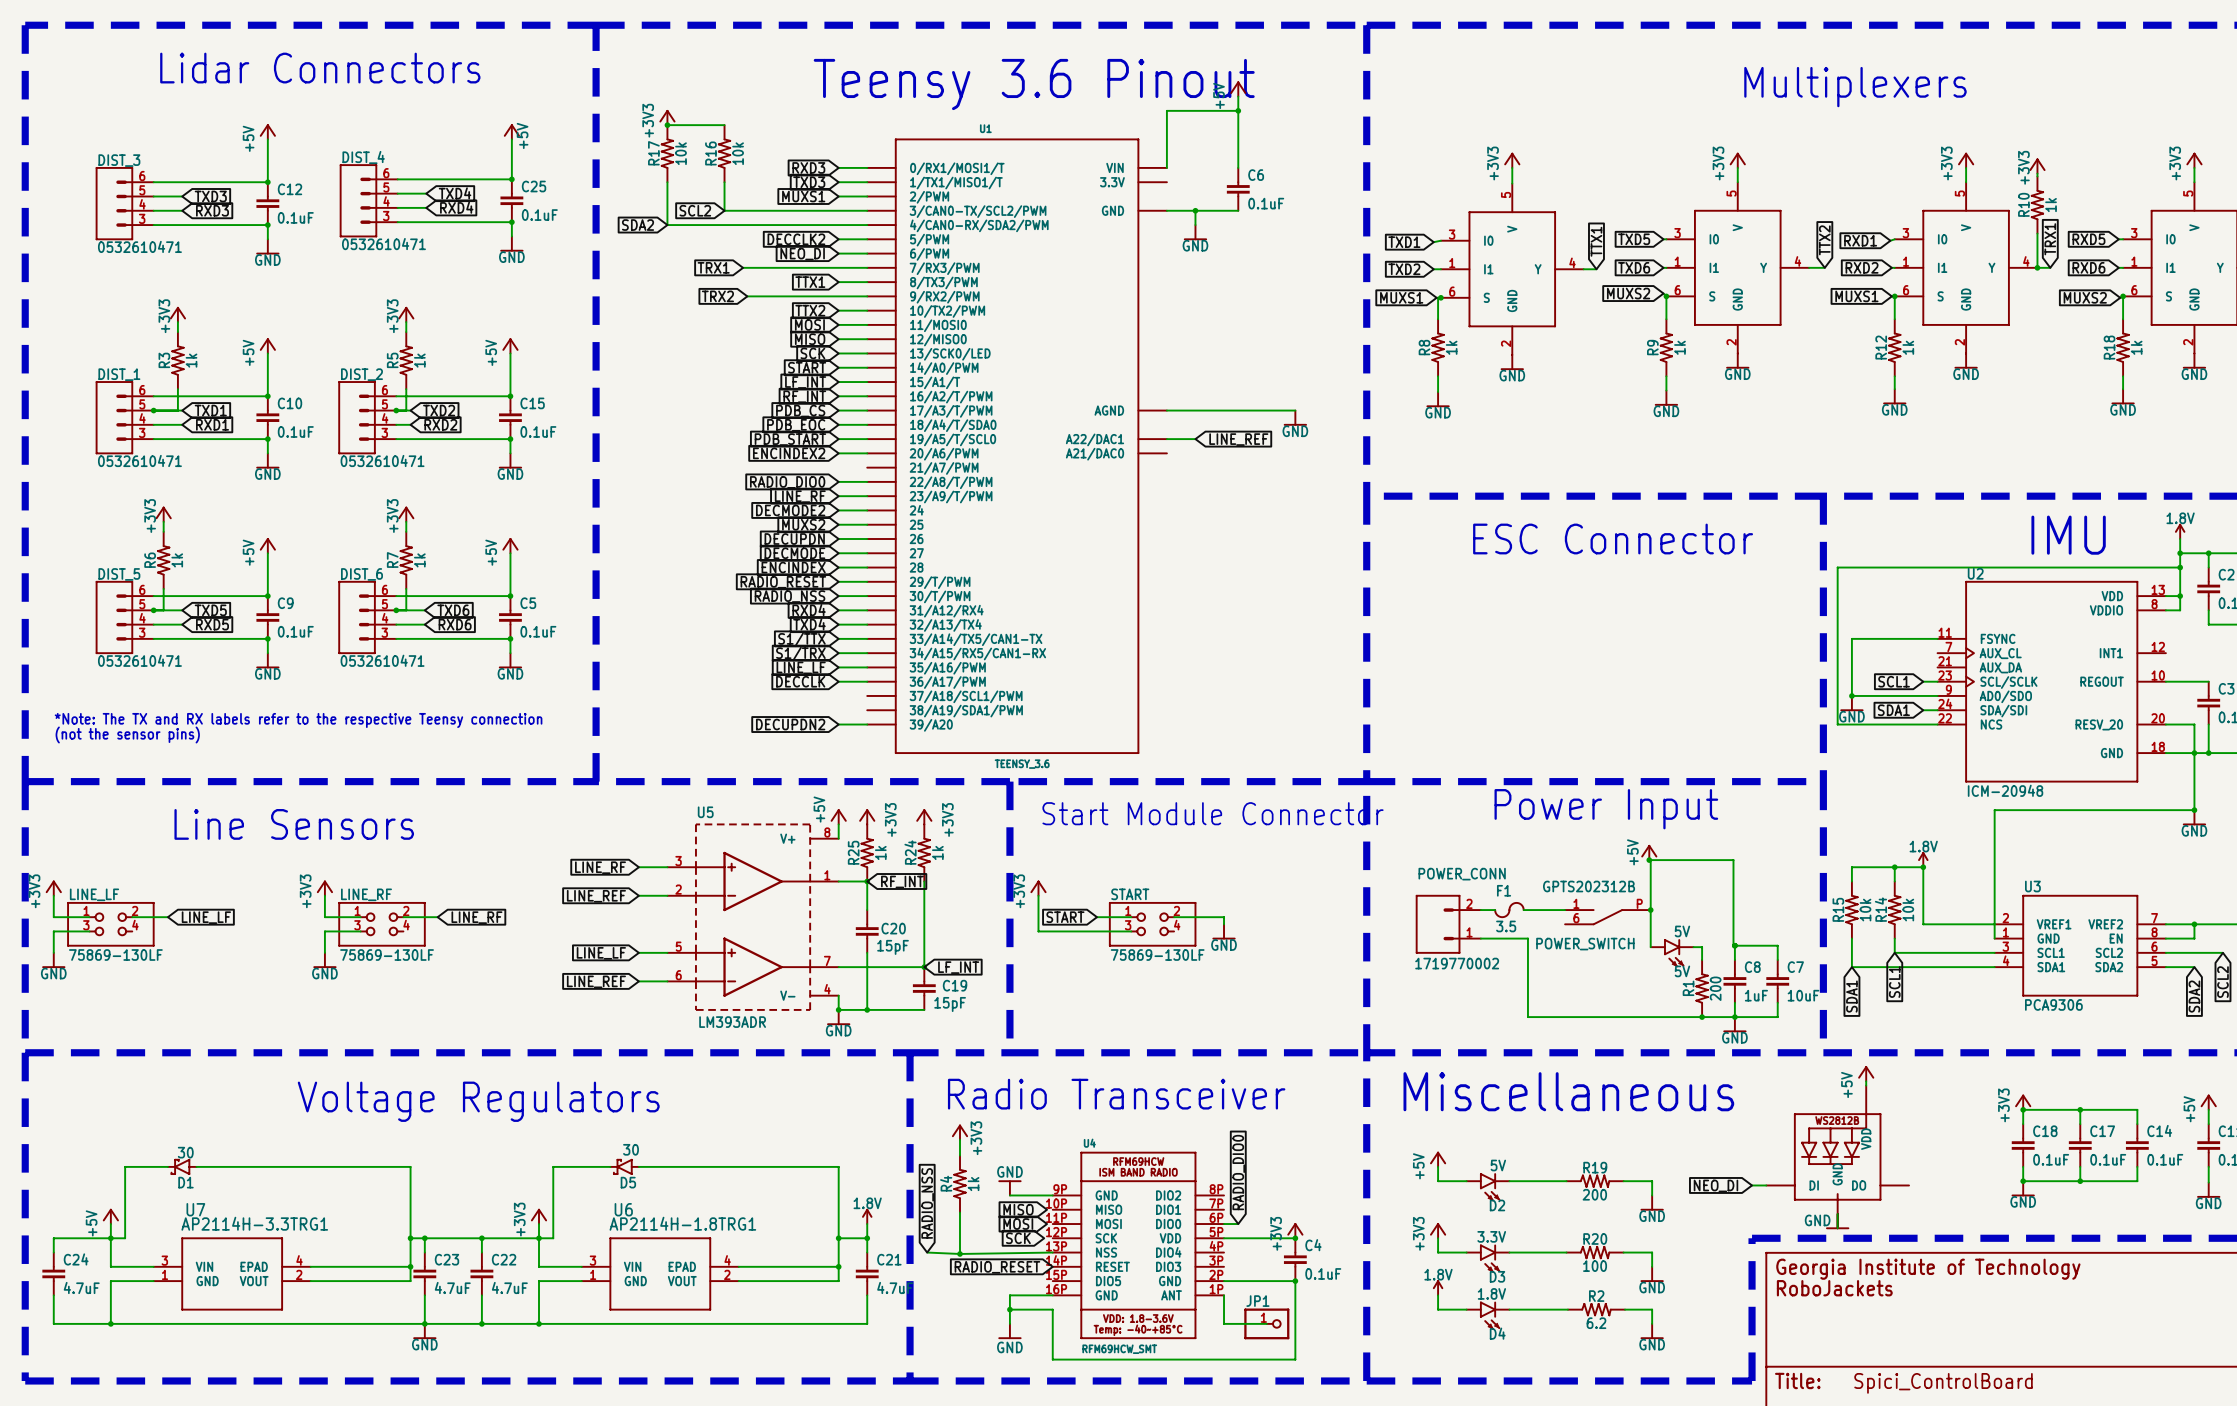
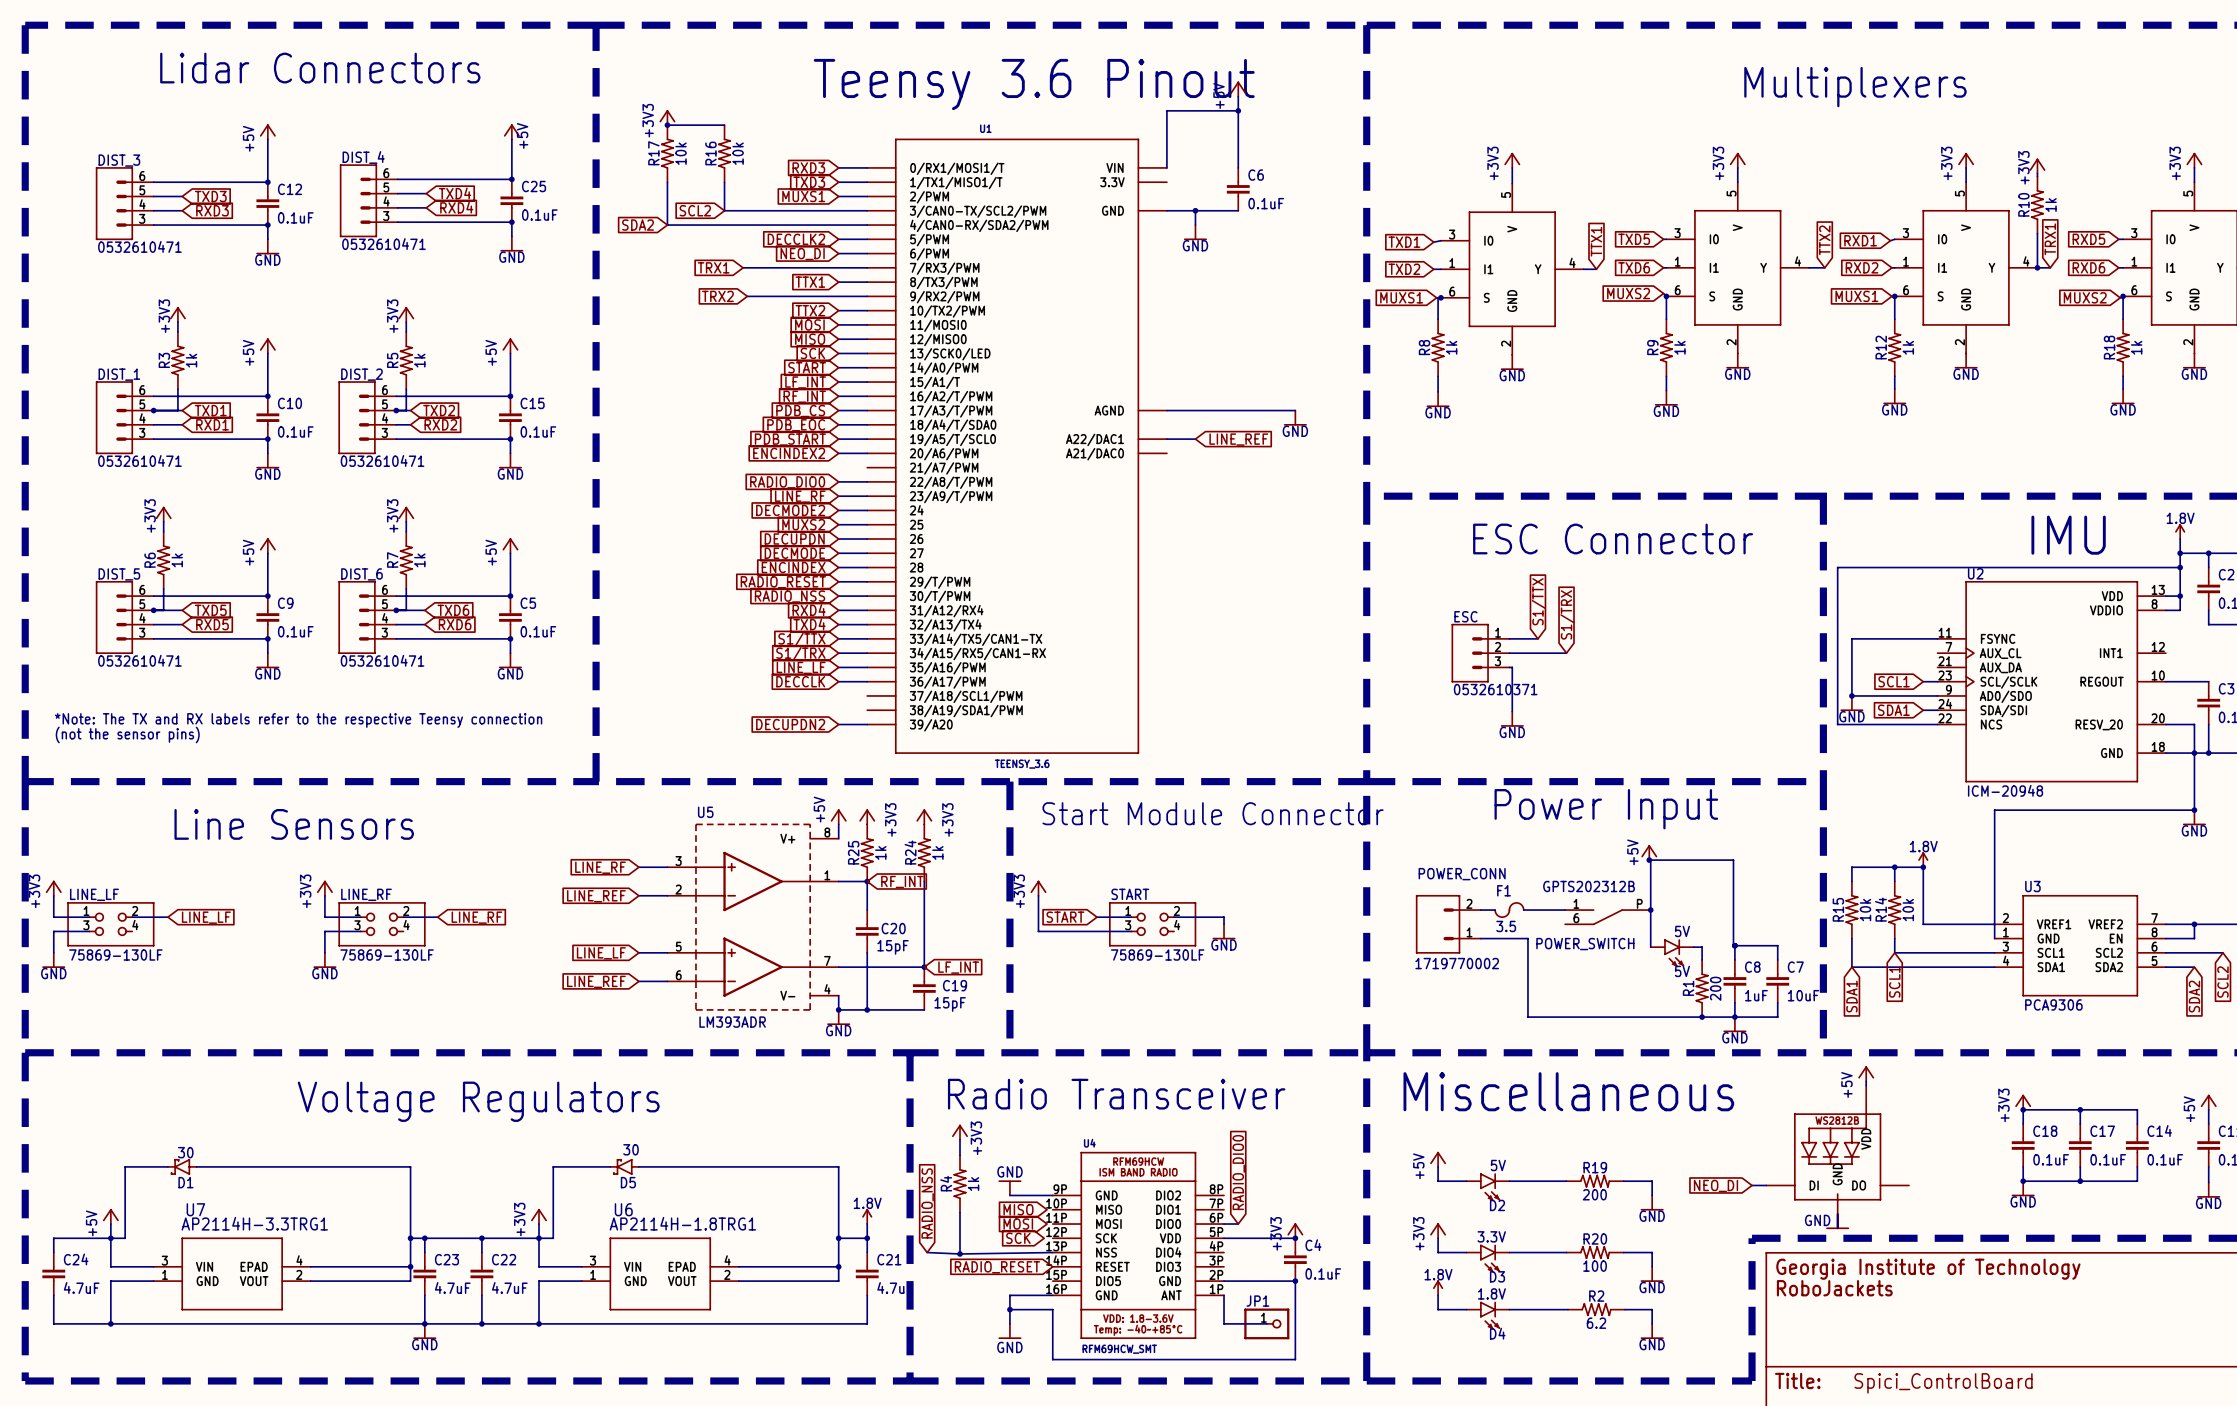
global label: none -> S1/TTX (1538, 601)
global label: none -> S1/TRX (1567, 614)
wire: none -> (1509, 638) (1537, 638)
ESC: none -> 0532610371 (1480, 653)
wire: none -> (1509, 653) (1566, 653)
wire: none -> (1509, 667) (1512, 667) (1512, 711)
power symbol: none -> GND (1512, 719)

